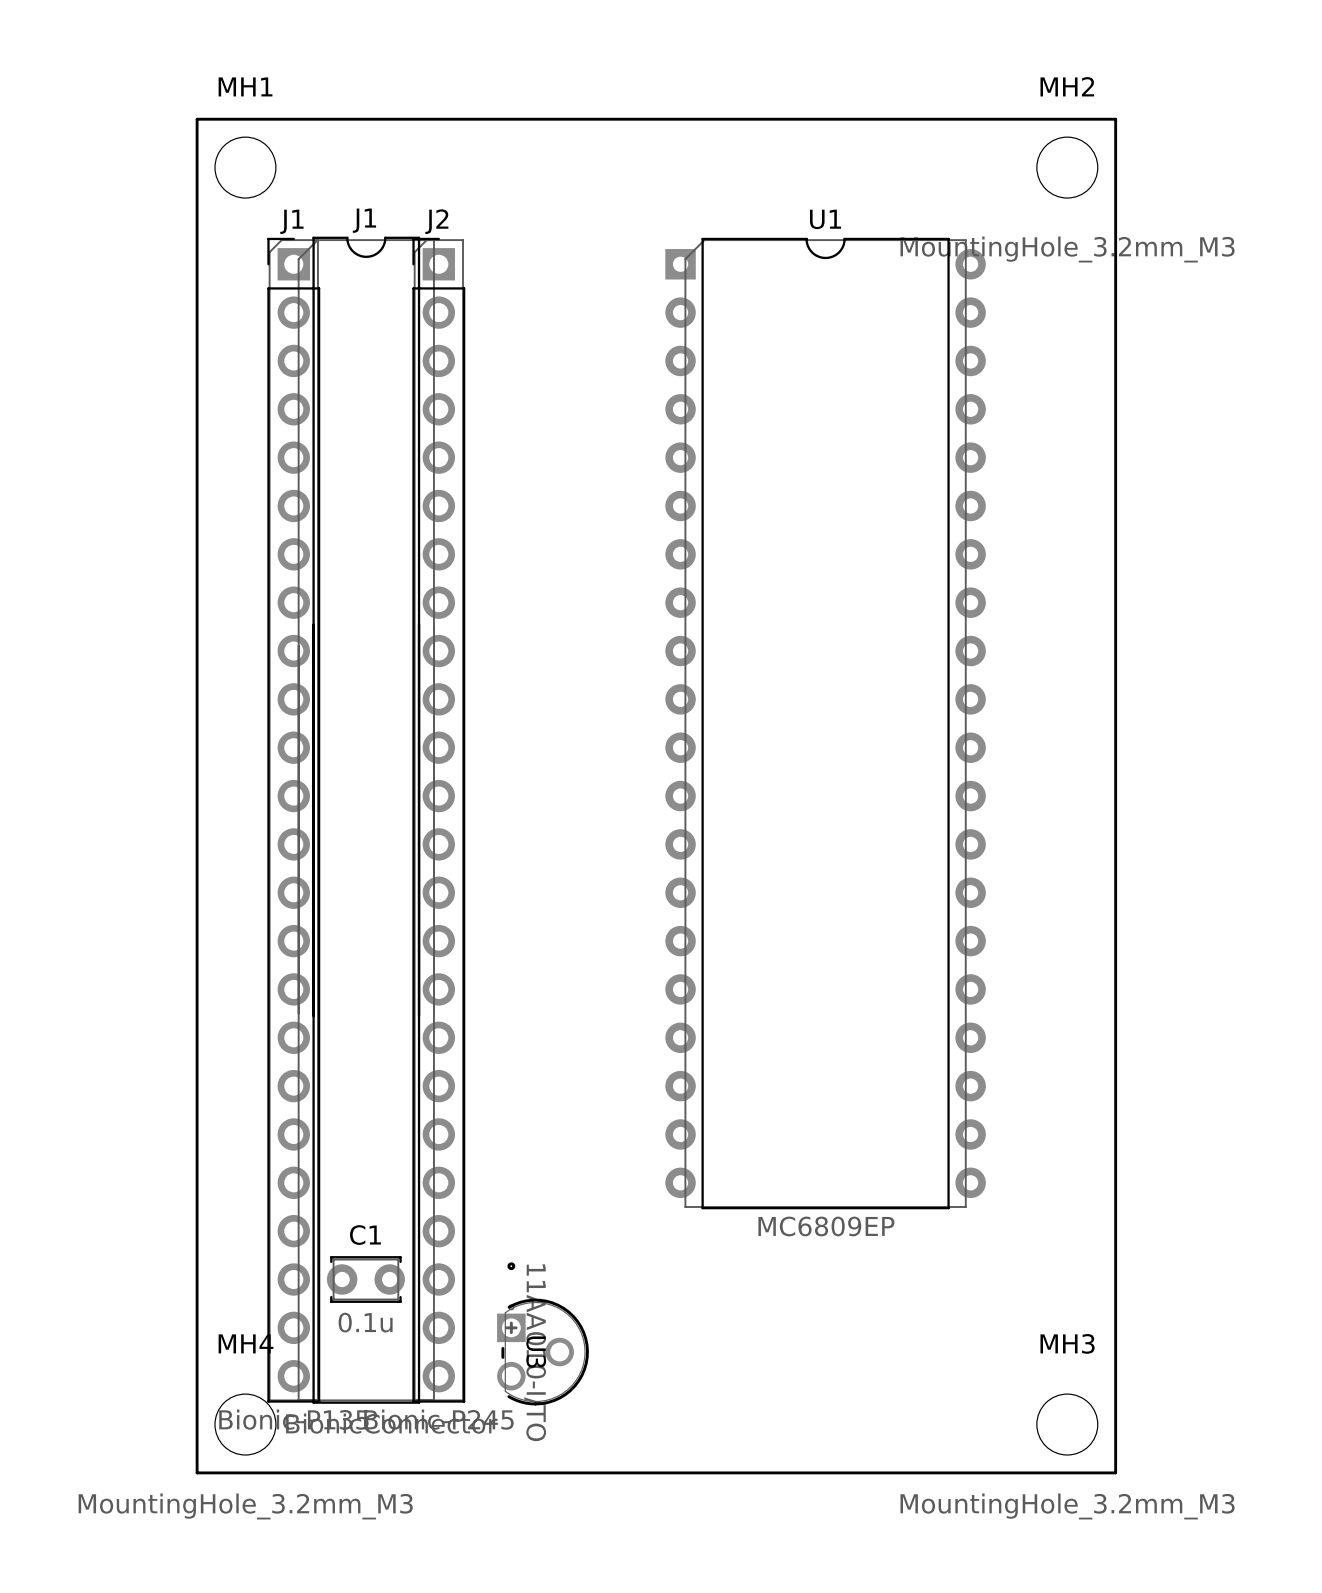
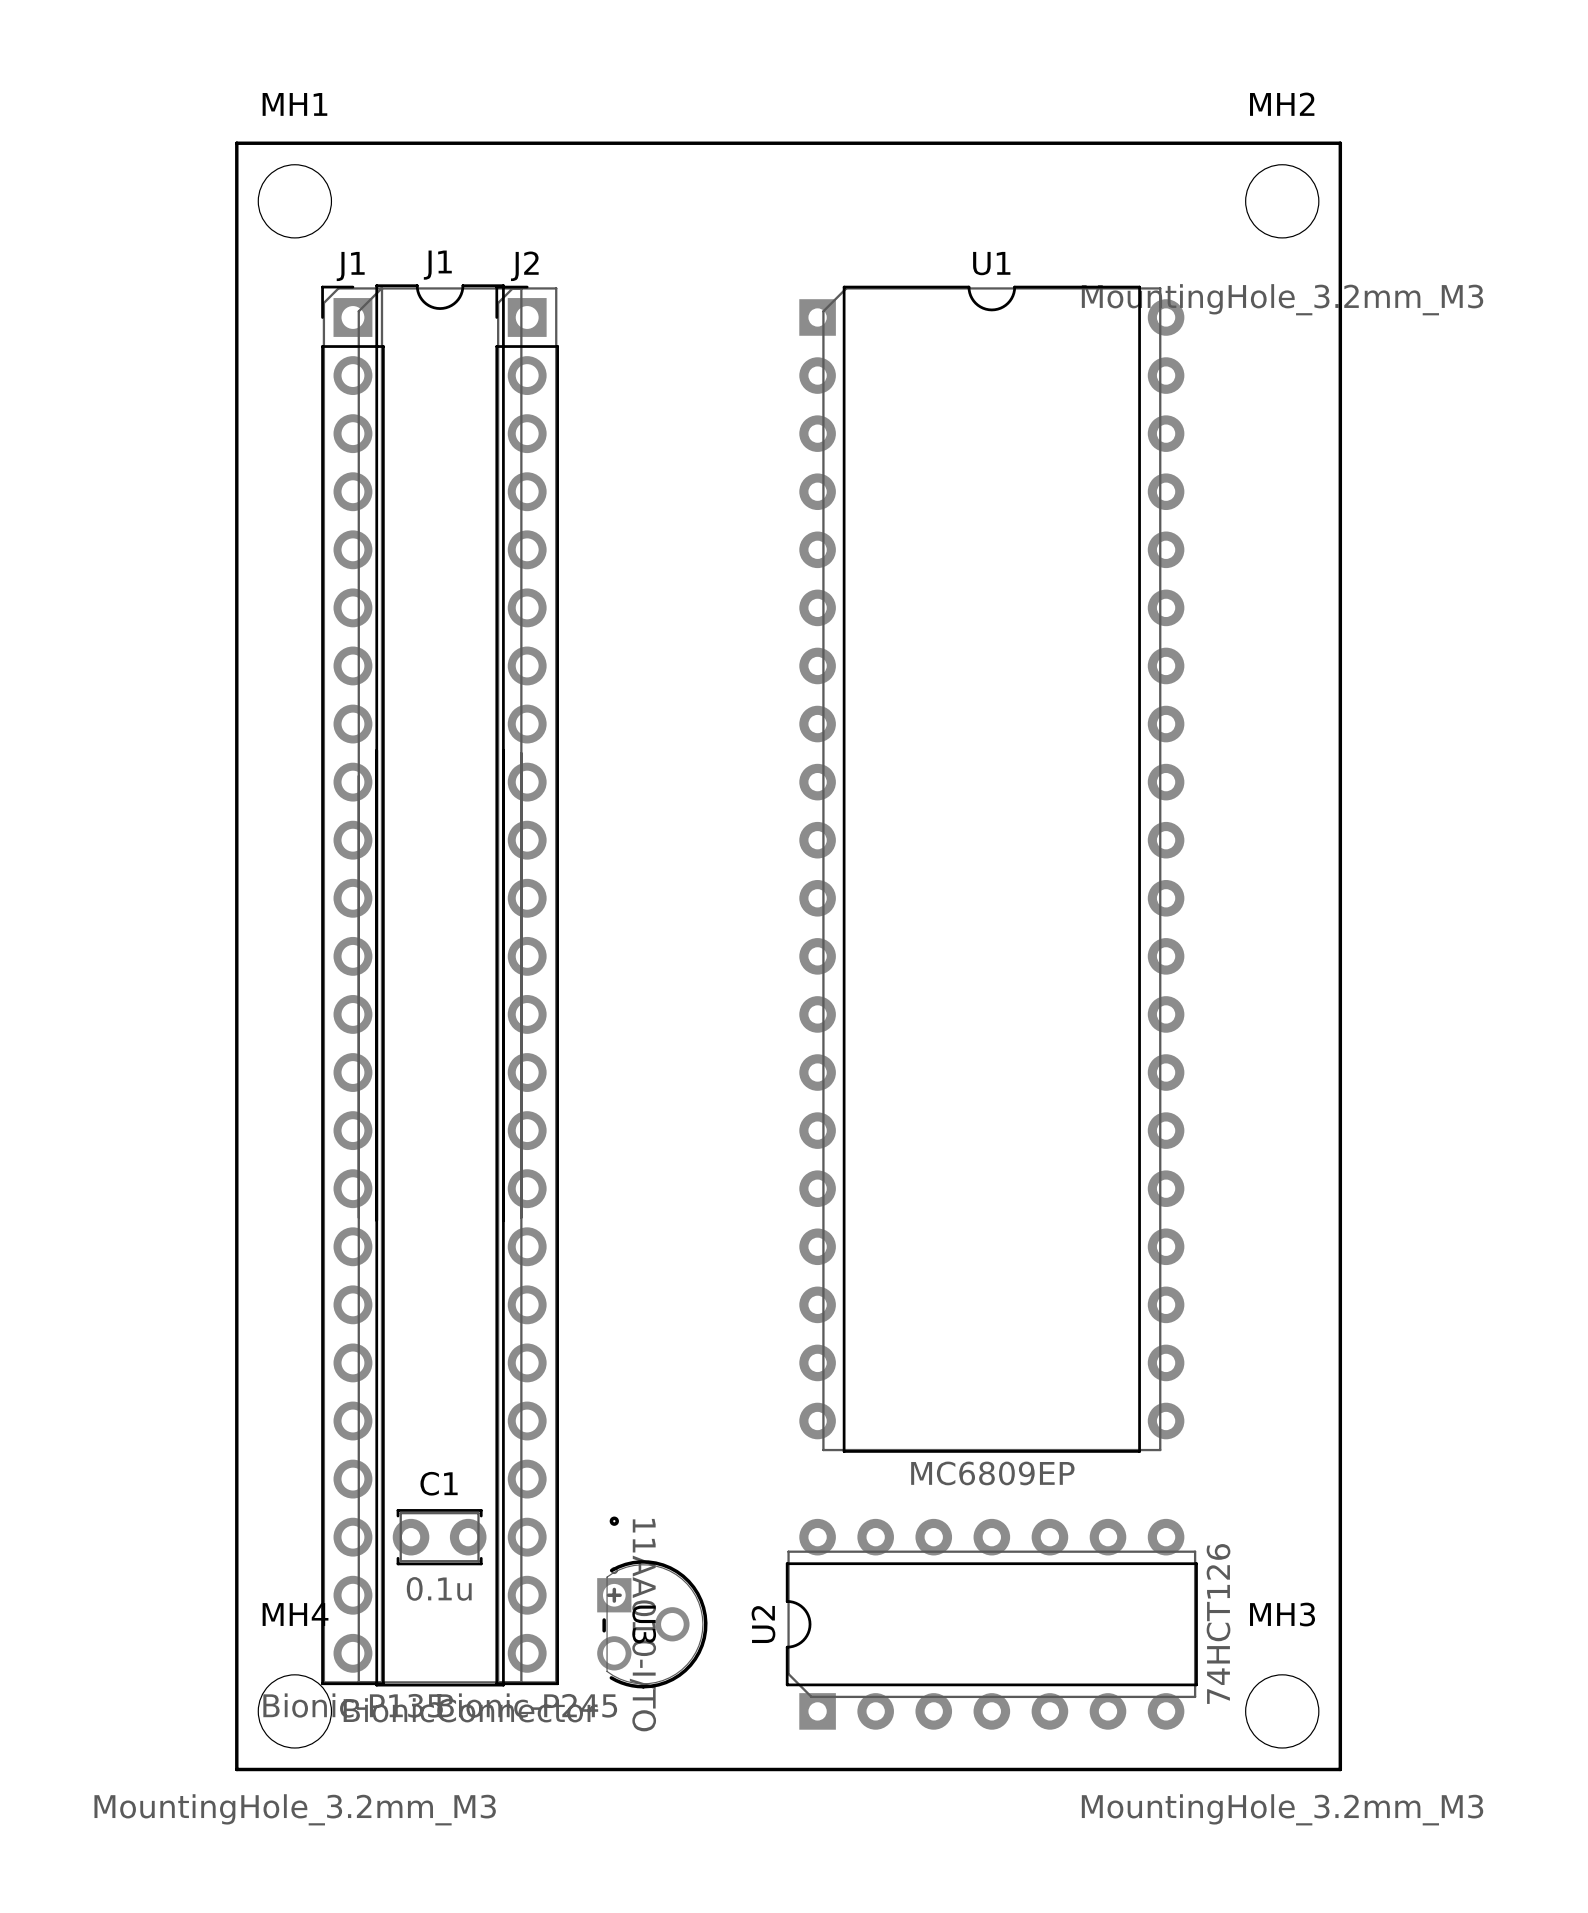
U2: none -> 74HCT126 (991, 1624)

